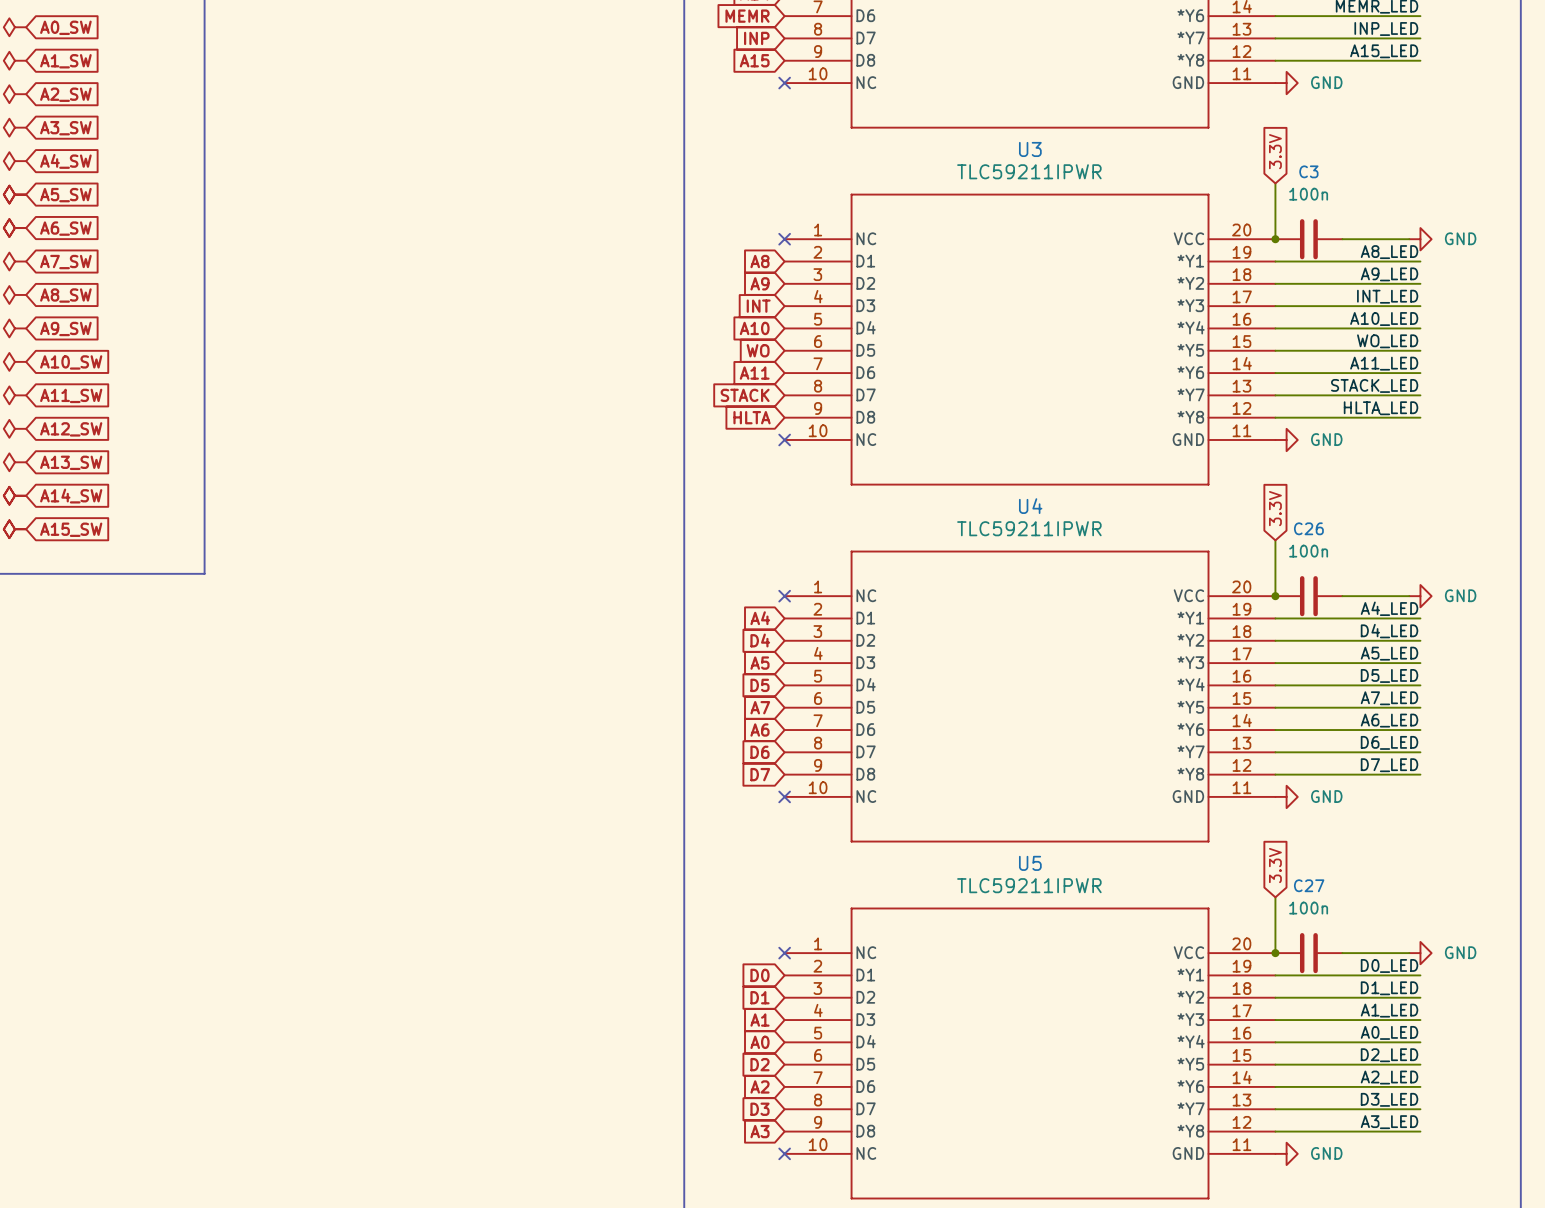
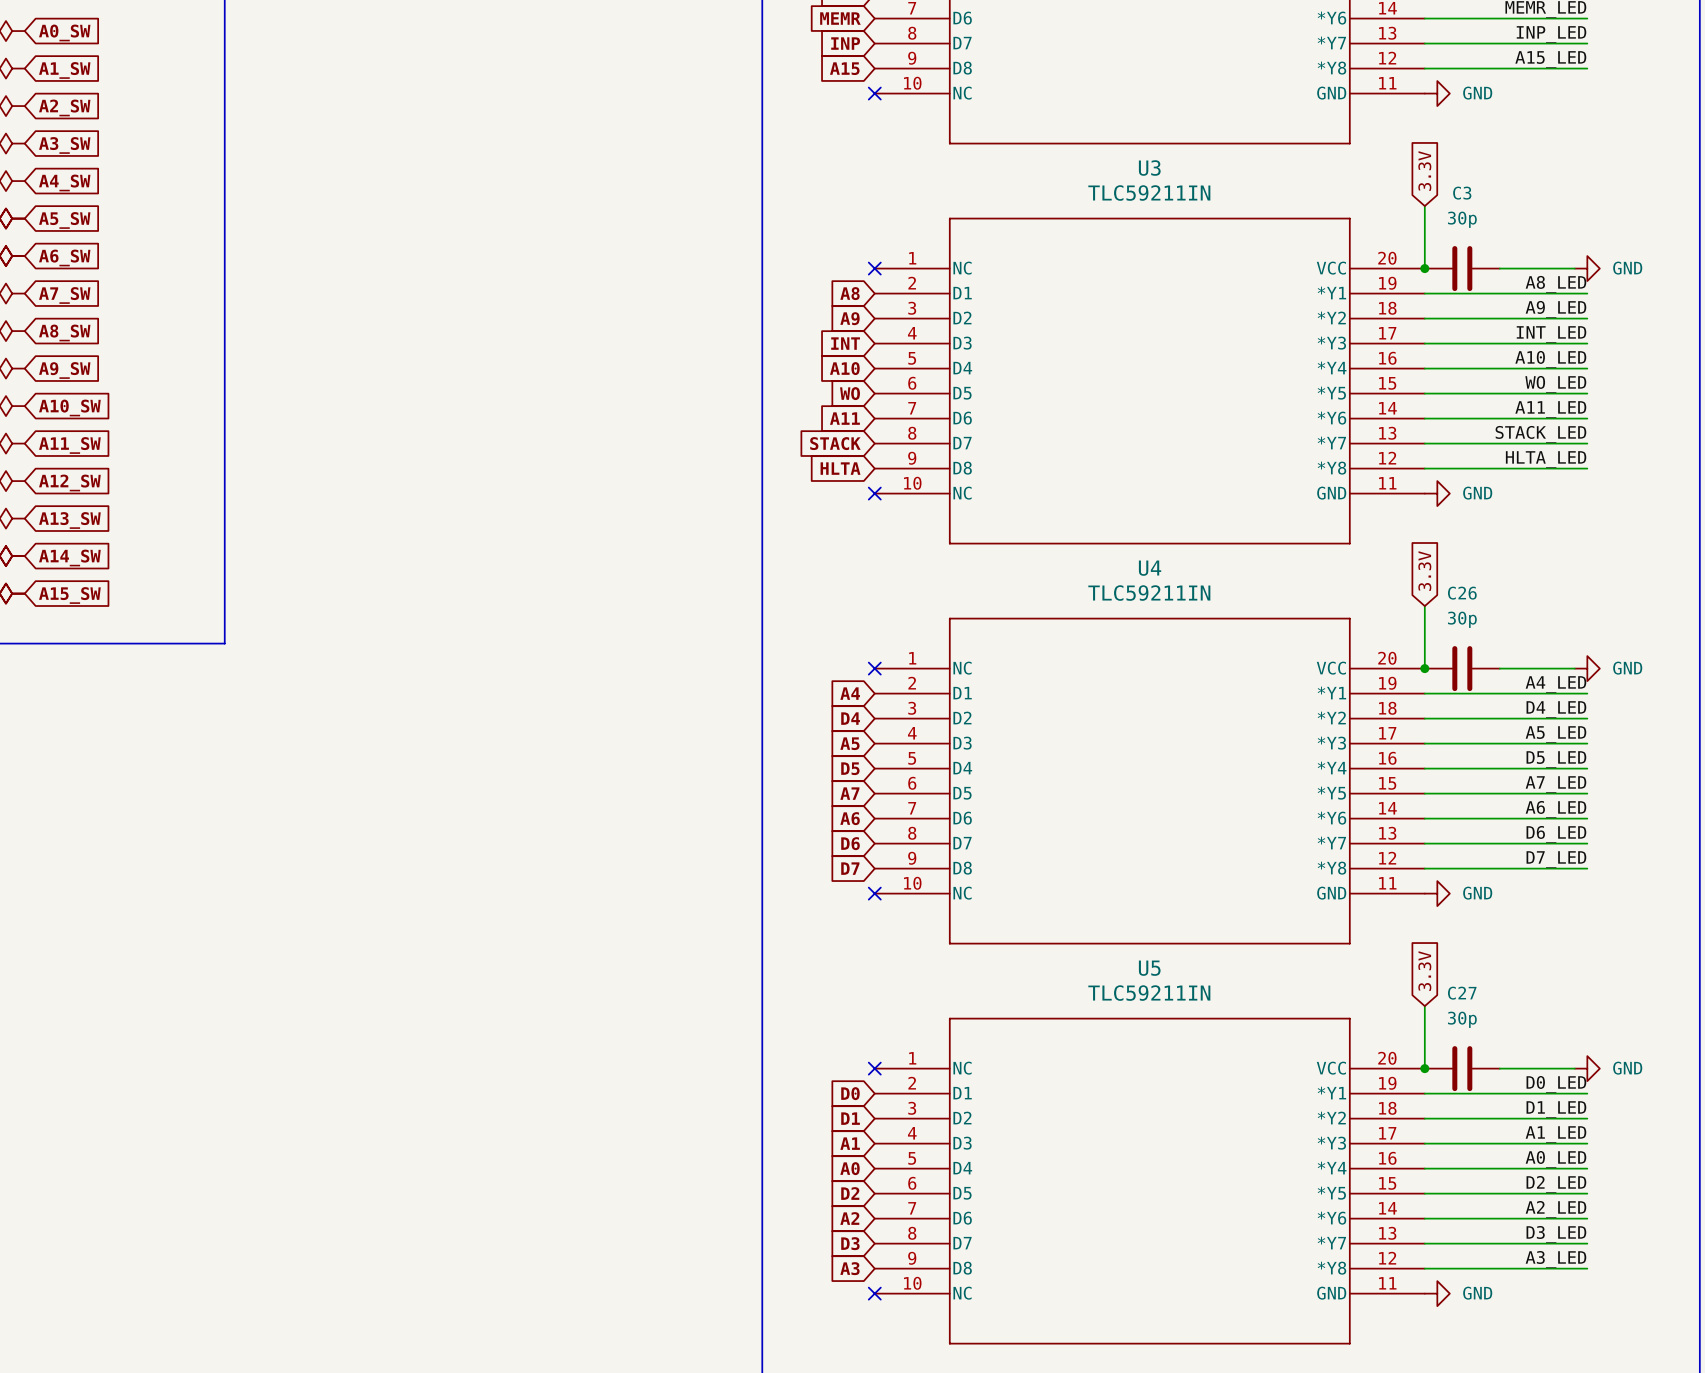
U3 value: TLC59211IPWR (1029, 171) -> TLC59211IN (1149, 193)
C3 value: 100n (1308, 194) -> 30p (1462, 219)
U4 value: TLC59211IPWR (1029, 528) -> TLC59211IN (1149, 593)
C26 value: 100n (1308, 551) -> 30p (1462, 619)
U5 value: TLC59211IPWR (1029, 885) -> TLC59211IN (1149, 993)
C27 value: 100n (1308, 908) -> 30p (1462, 1019)

